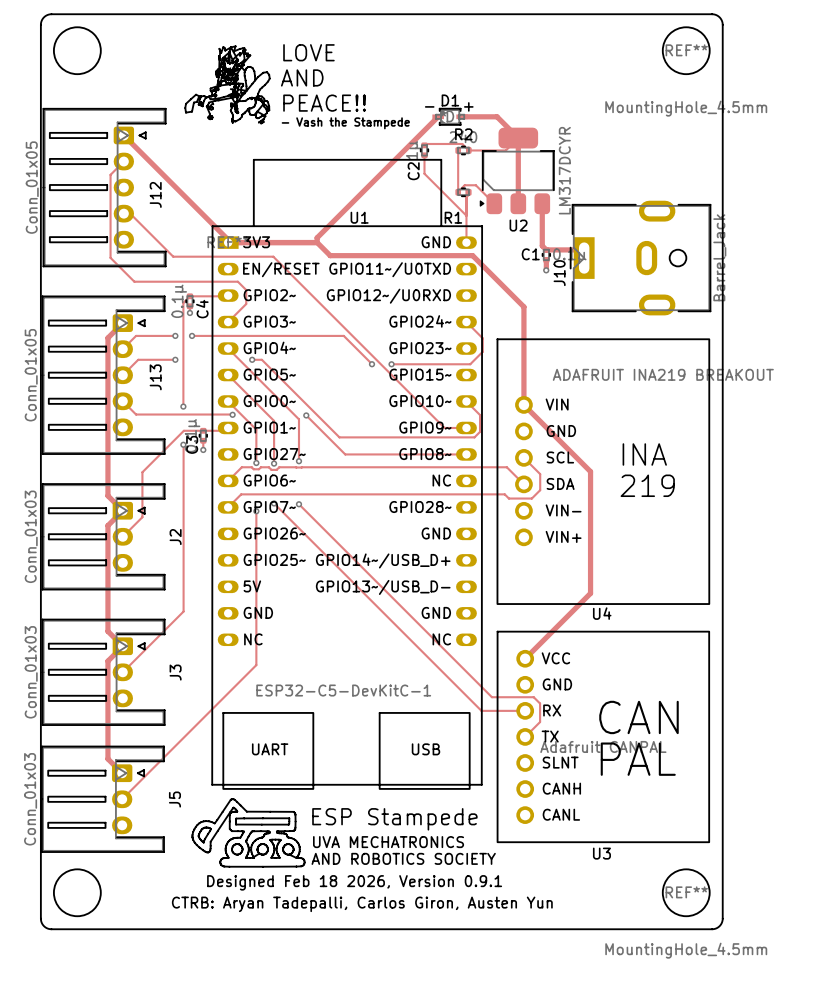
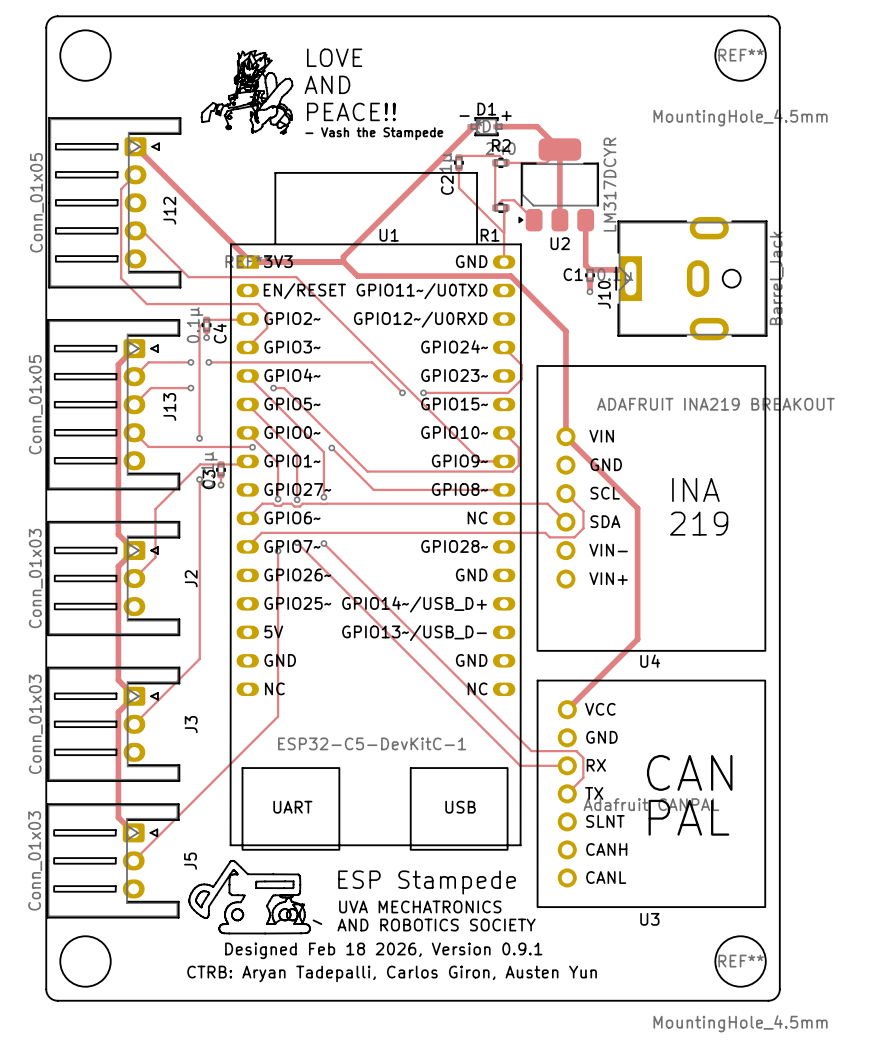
line: (246, 811) (234, 800) (231, 799) (214, 823) (208, 821) (201, 822) (193, 832) (194, 842) (203, 850) (209, 852) (210, 841) (232, 808) (235, 809) (237, 811) (230, 813) (229, 829) (231, 831) (243, 831) (240, 837) (231, 839) (226, 845) (225, 851) (228, 857) (222, 858) (220, 862) (222, 866) (229, 866) -> (267, 874) (247, 874) (235, 861) (231, 860) (213, 886) (207, 884) (198, 885) (190, 896) (191, 907) (200, 915) (207, 917) (208, 906) (233, 869) (237, 874) (229, 876) (229, 892) (231, 895) (244, 895) (240, 902) (232, 903) (227, 907) (225, 915) (228, 923) (221, 924) (219, 929) (223, 933) (249, 933)
line: (251, 811) (293, 811) (295, 829) (276, 831) (285, 833) (287, 837) (297, 841) (299, 849) (296, 858) (302, 858) (304, 862) (301, 866) (244, 866) -> (273, 874) (298, 874) (299, 876) (299, 893) (280, 895) (289, 898) (291, 901) (301, 906) (304, 914) (301, 924) (308, 924) (310, 928) (306, 933) (265, 933)
line: (270, 818) (289, 818) (289, 824) (269, 824) -> (293, 881) (292, 888)
line: (206, 827) (202, 829) (198, 835) (203, 842) (211, 829) (206, 827) -> (204, 891) (199, 893) (195, 900) (201, 907) (209, 893) (204, 891)
line: (236, 844) (233, 846) (232, 850) (237, 854) (242, 849) (240, 845) (236, 844) -> (237, 909) (233, 911) (231, 915) (234, 919) (238, 920) (243, 914) (241, 910) (237, 909)
line: (288, 844) (283, 849) (284, 852) (288, 854) (293, 849) (288, 844) -> (292, 909) (286, 914) (288, 918) (292, 920) (295, 919) (298, 914) (296, 910) (292, 909)

